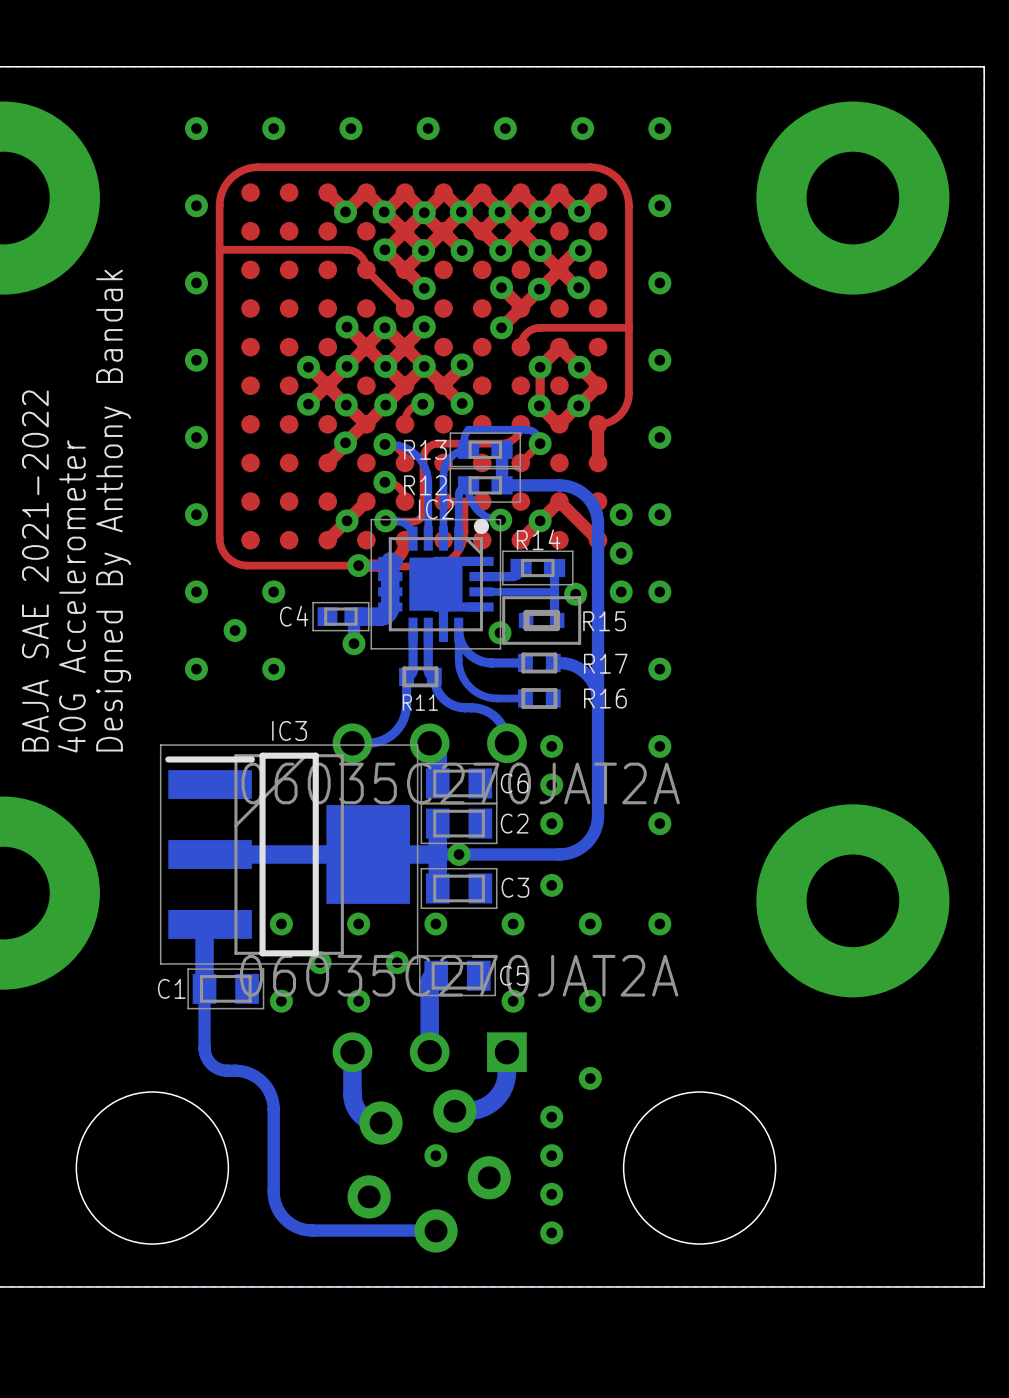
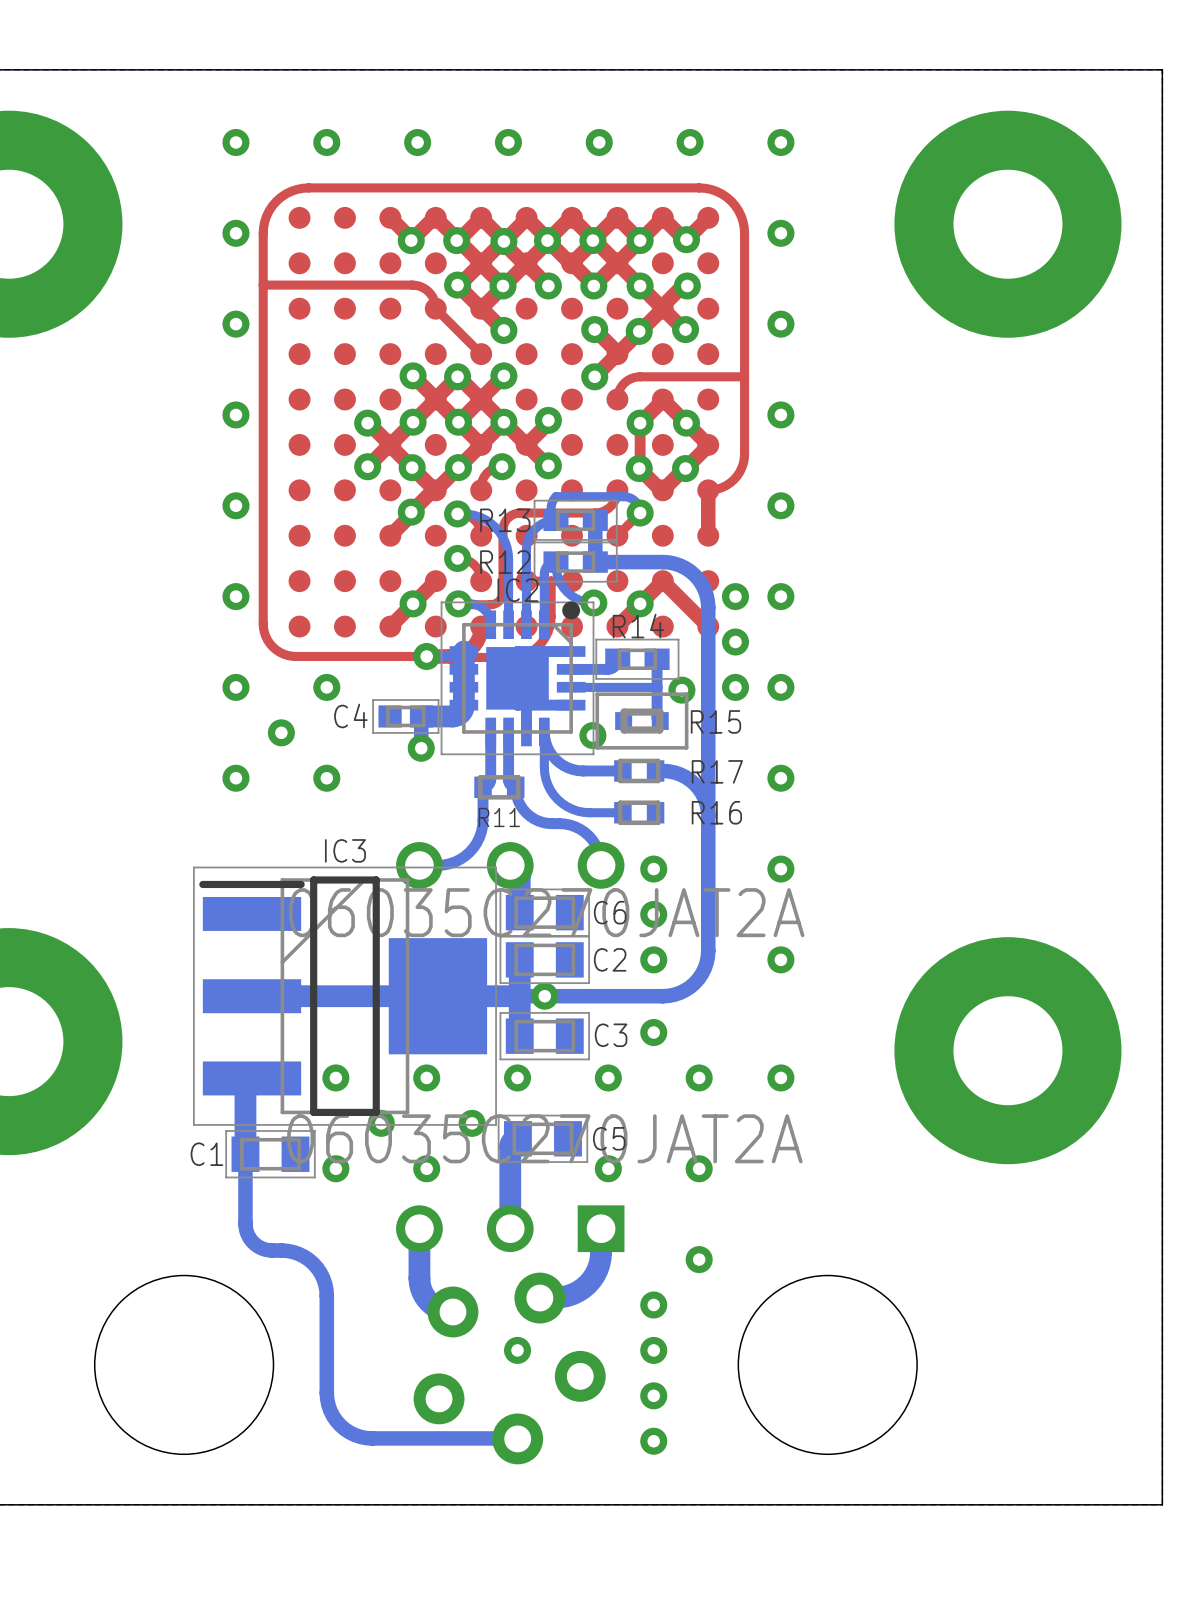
text: Designed By Anthony Bandak (113, 510) -> none
text: BAJA SAE 2021-2022 (35, 571) -> none
text: 40G Accelerometer (71, 596) -> none

